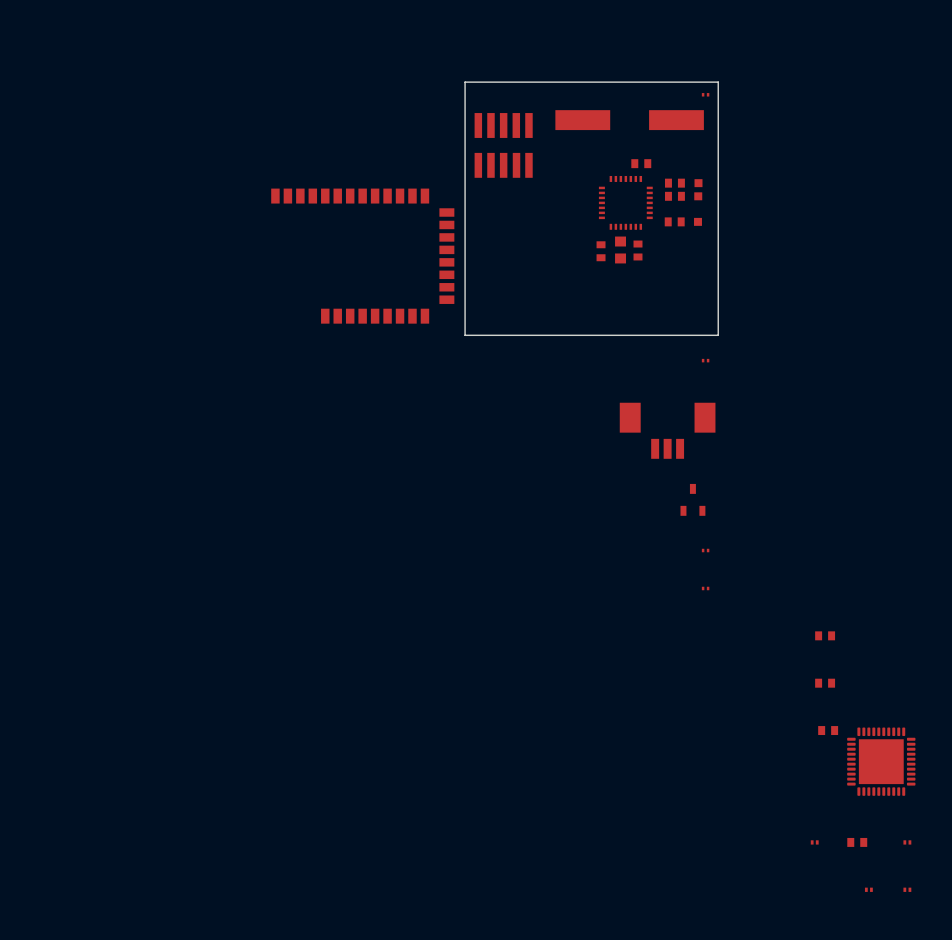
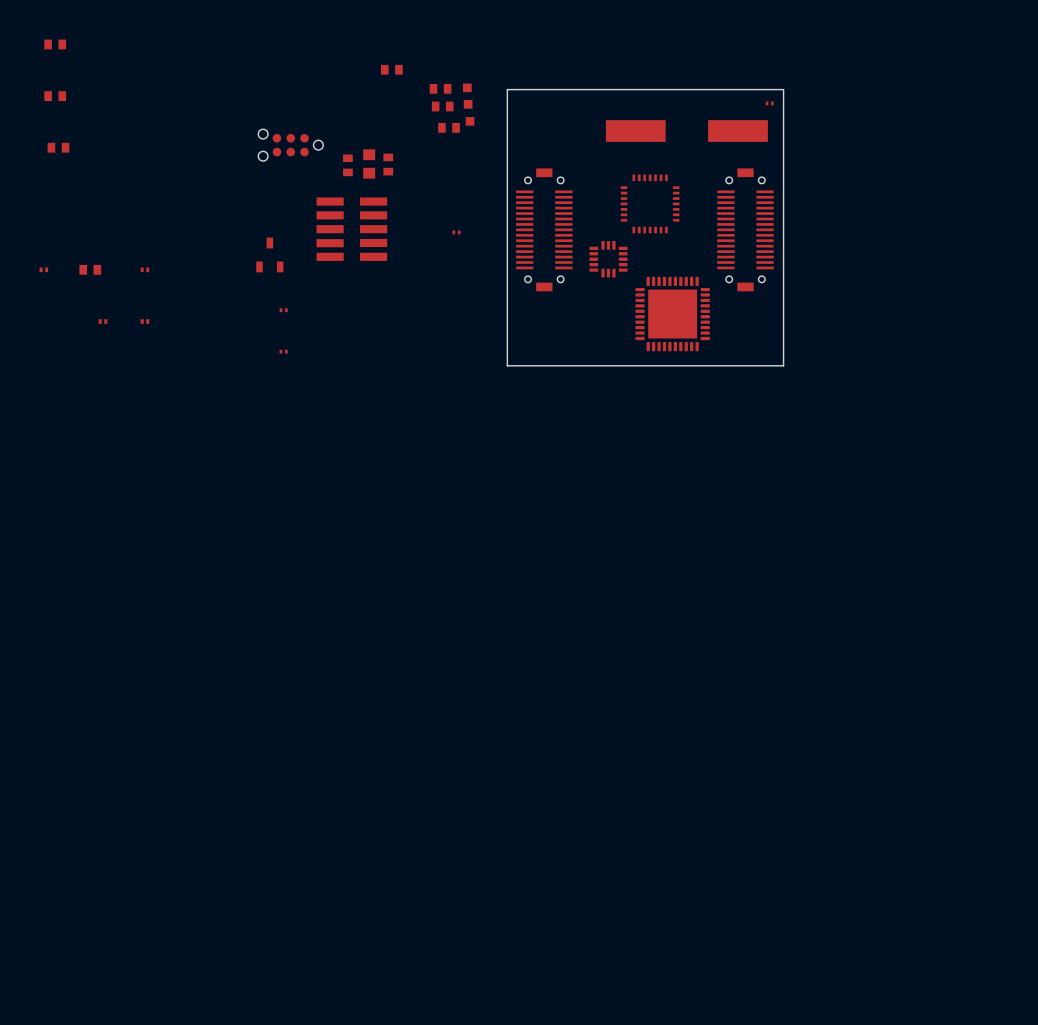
part: none -> (55, 44)
part: none -> (391, 69)
part: none -> (467, 87)
part: none -> (440, 88)
part: none -> (55, 96)
part: none -> (468, 104)
part: none -> (442, 106)
part: none -> (470, 121)
part: none -> (448, 127)
part: none -> (290, 145)
part: none -> (58, 147)
part rotation: 0° (503, 145) -> 90° clockwise (351, 229)
part position: (503, 145) -> (351, 229)
part: none -> (369, 163)
part: none -> (388, 164)
part: none -> (347, 165)
part: (641, 163) -> none
part: (674, 183) -> none
part: (698, 183) -> none
part: (674, 196) -> none
part: (698, 196) -> none
part position: (625, 202) -> (650, 203)
part: none -> (544, 229)
part: none -> (745, 229)
part: none -> (456, 232)
part: (674, 221) -> none
part: (698, 221) -> none
part: none -> (269, 254)
part: none -> (608, 259)
part: none -> (43, 269)
part: none -> (90, 269)
part: none -> (144, 269)
part: (620, 249) -> none
part: (637, 250) -> none
part: (601, 251) -> none
part: (362, 256) -> none
part: none -> (283, 310)
part: none -> (672, 314)
part: none -> (102, 321)
part: none -> (144, 321)
part: none -> (283, 351)
part: (705, 360) -> none
part: (667, 430) -> none
part: (692, 499) -> none
part: (705, 550) -> none
part: (705, 588) -> none
part: (825, 635) -> none
part: (825, 683) -> none
part: (828, 730) -> none
part: (881, 761) -> none
part: (814, 842) -> none
part: (857, 842) -> none
part: (907, 842) -> none
part: (868, 889) -> none
part: (907, 889) -> none

